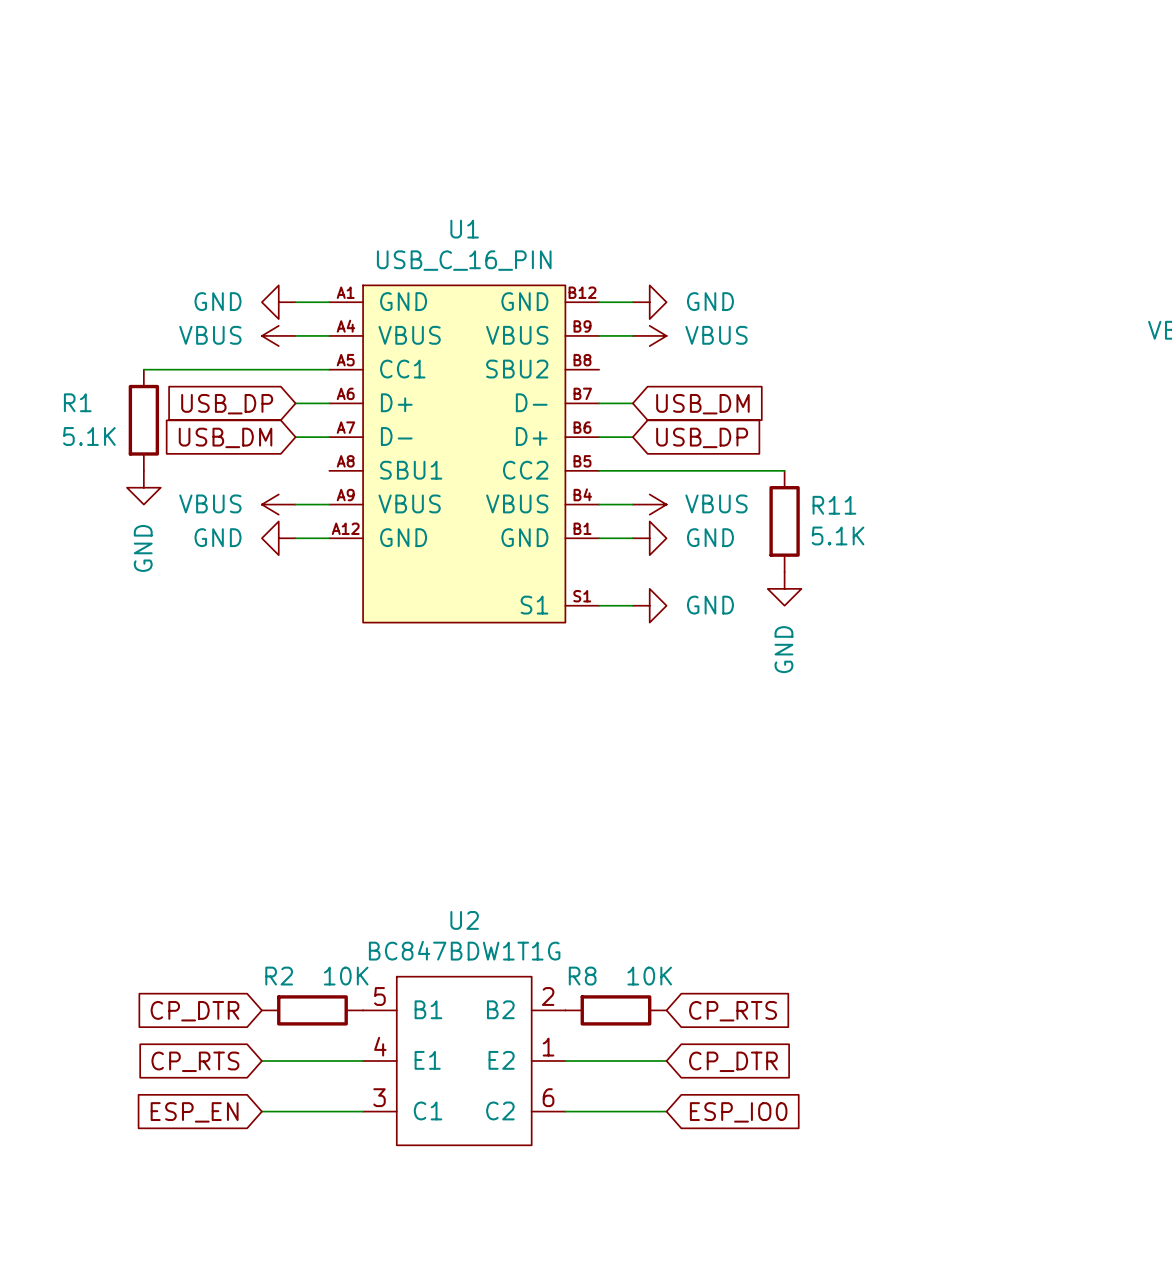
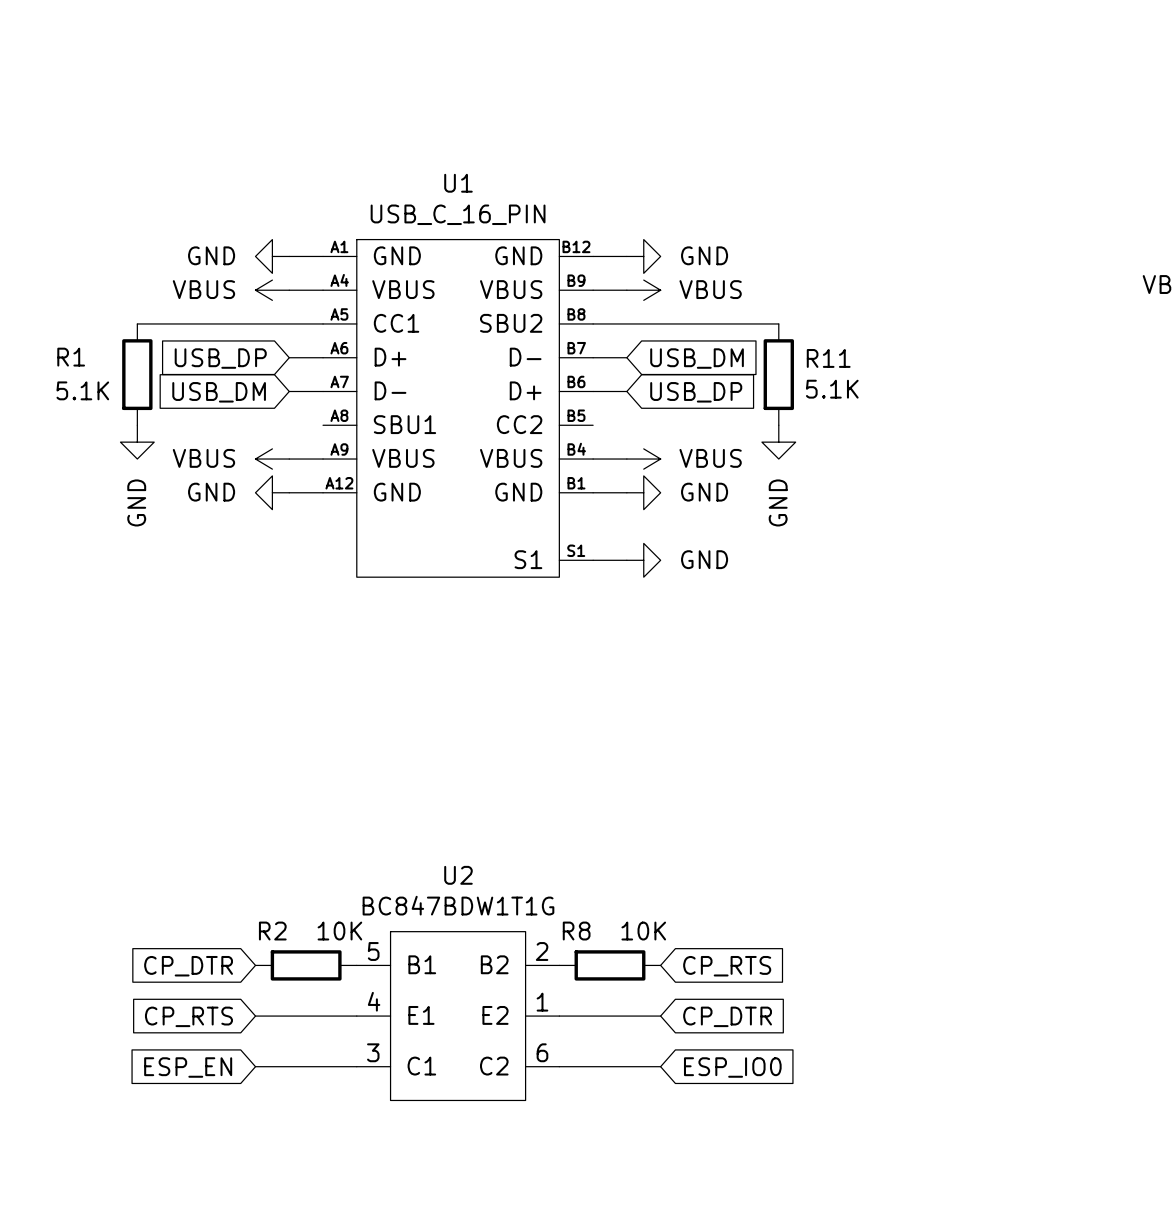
wire: (599, 470) (784, 470) -> (593, 323) (778, 323)
R11 position: (784, 521) -> (778, 374)
power symbol position: GND (784, 588) -> GND (778, 442)

